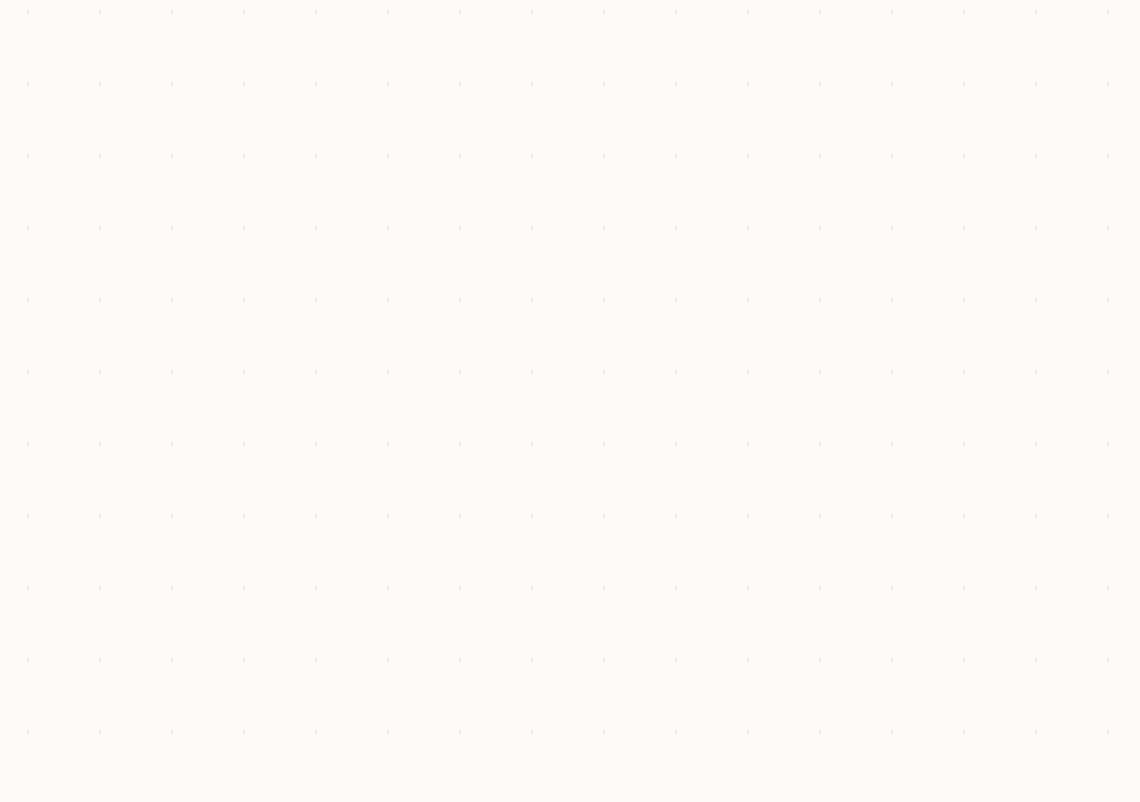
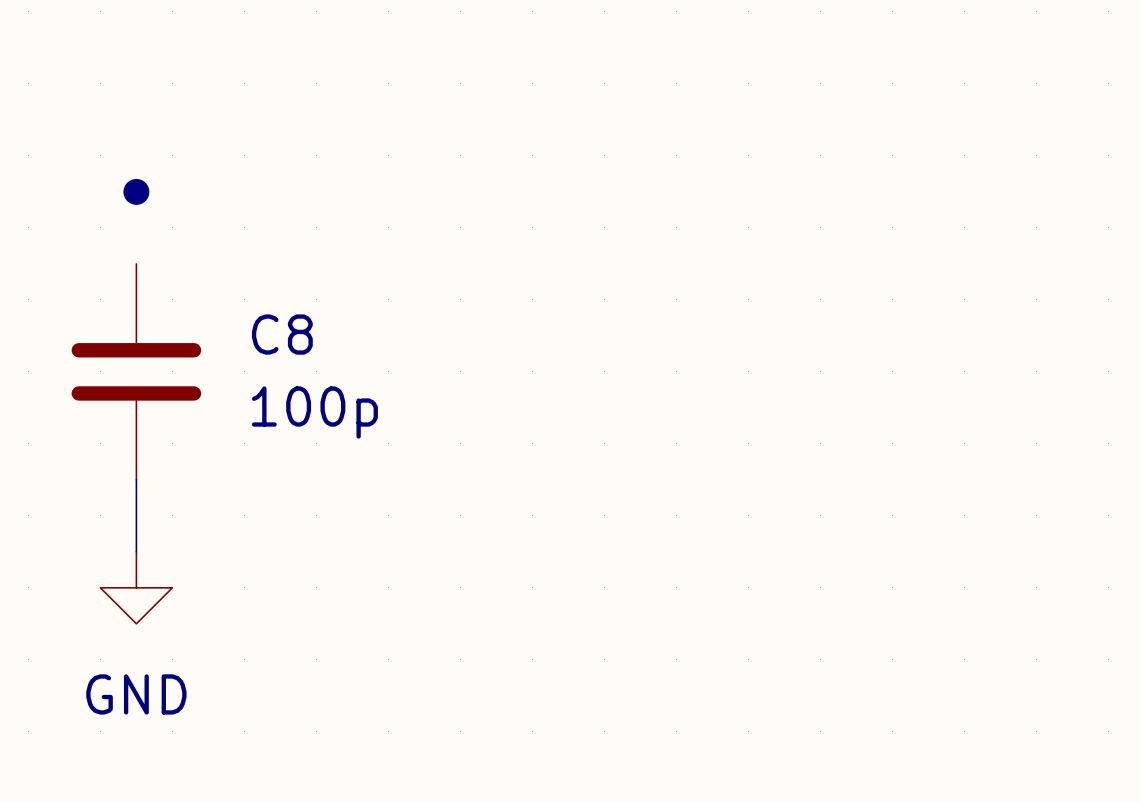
junction: none -> (136, 191)
C8: none -> 100p (136, 371)
wire: none -> (136, 479) (136, 551)
power symbol: none -> GND (136, 587)

